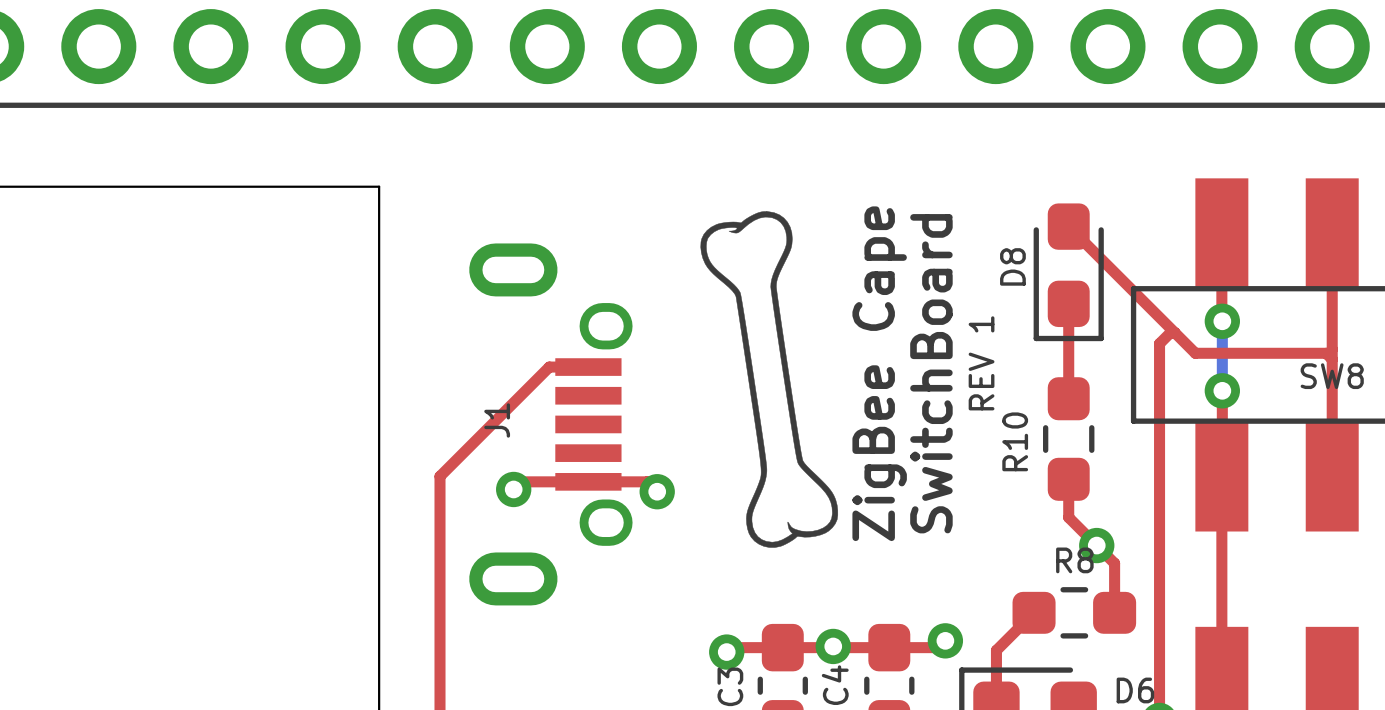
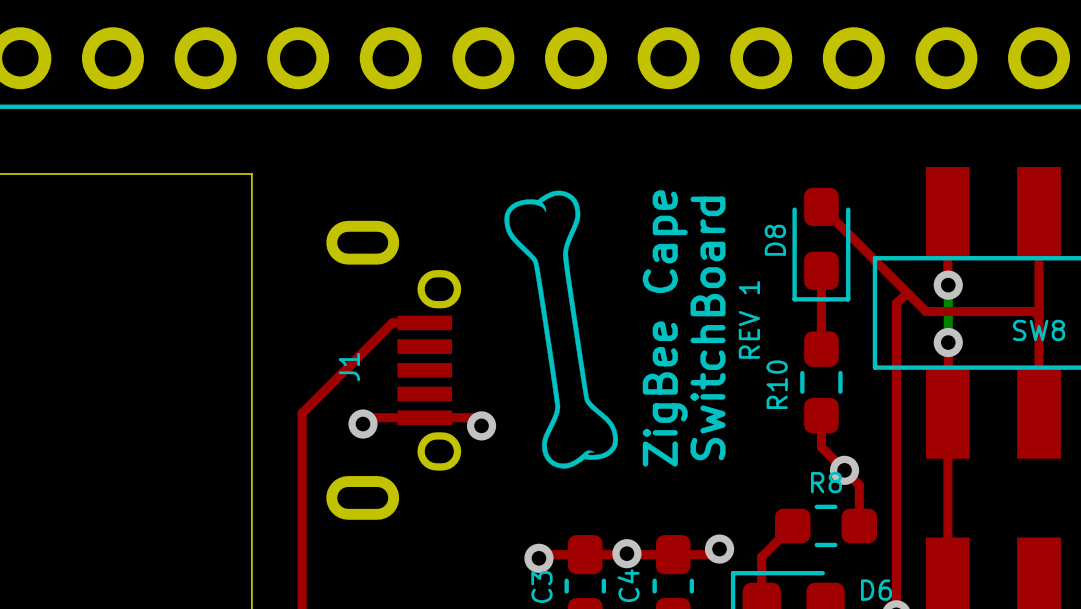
drawing shape: [700, 211, 839, 548] -> [504, 190, 619, 469]

